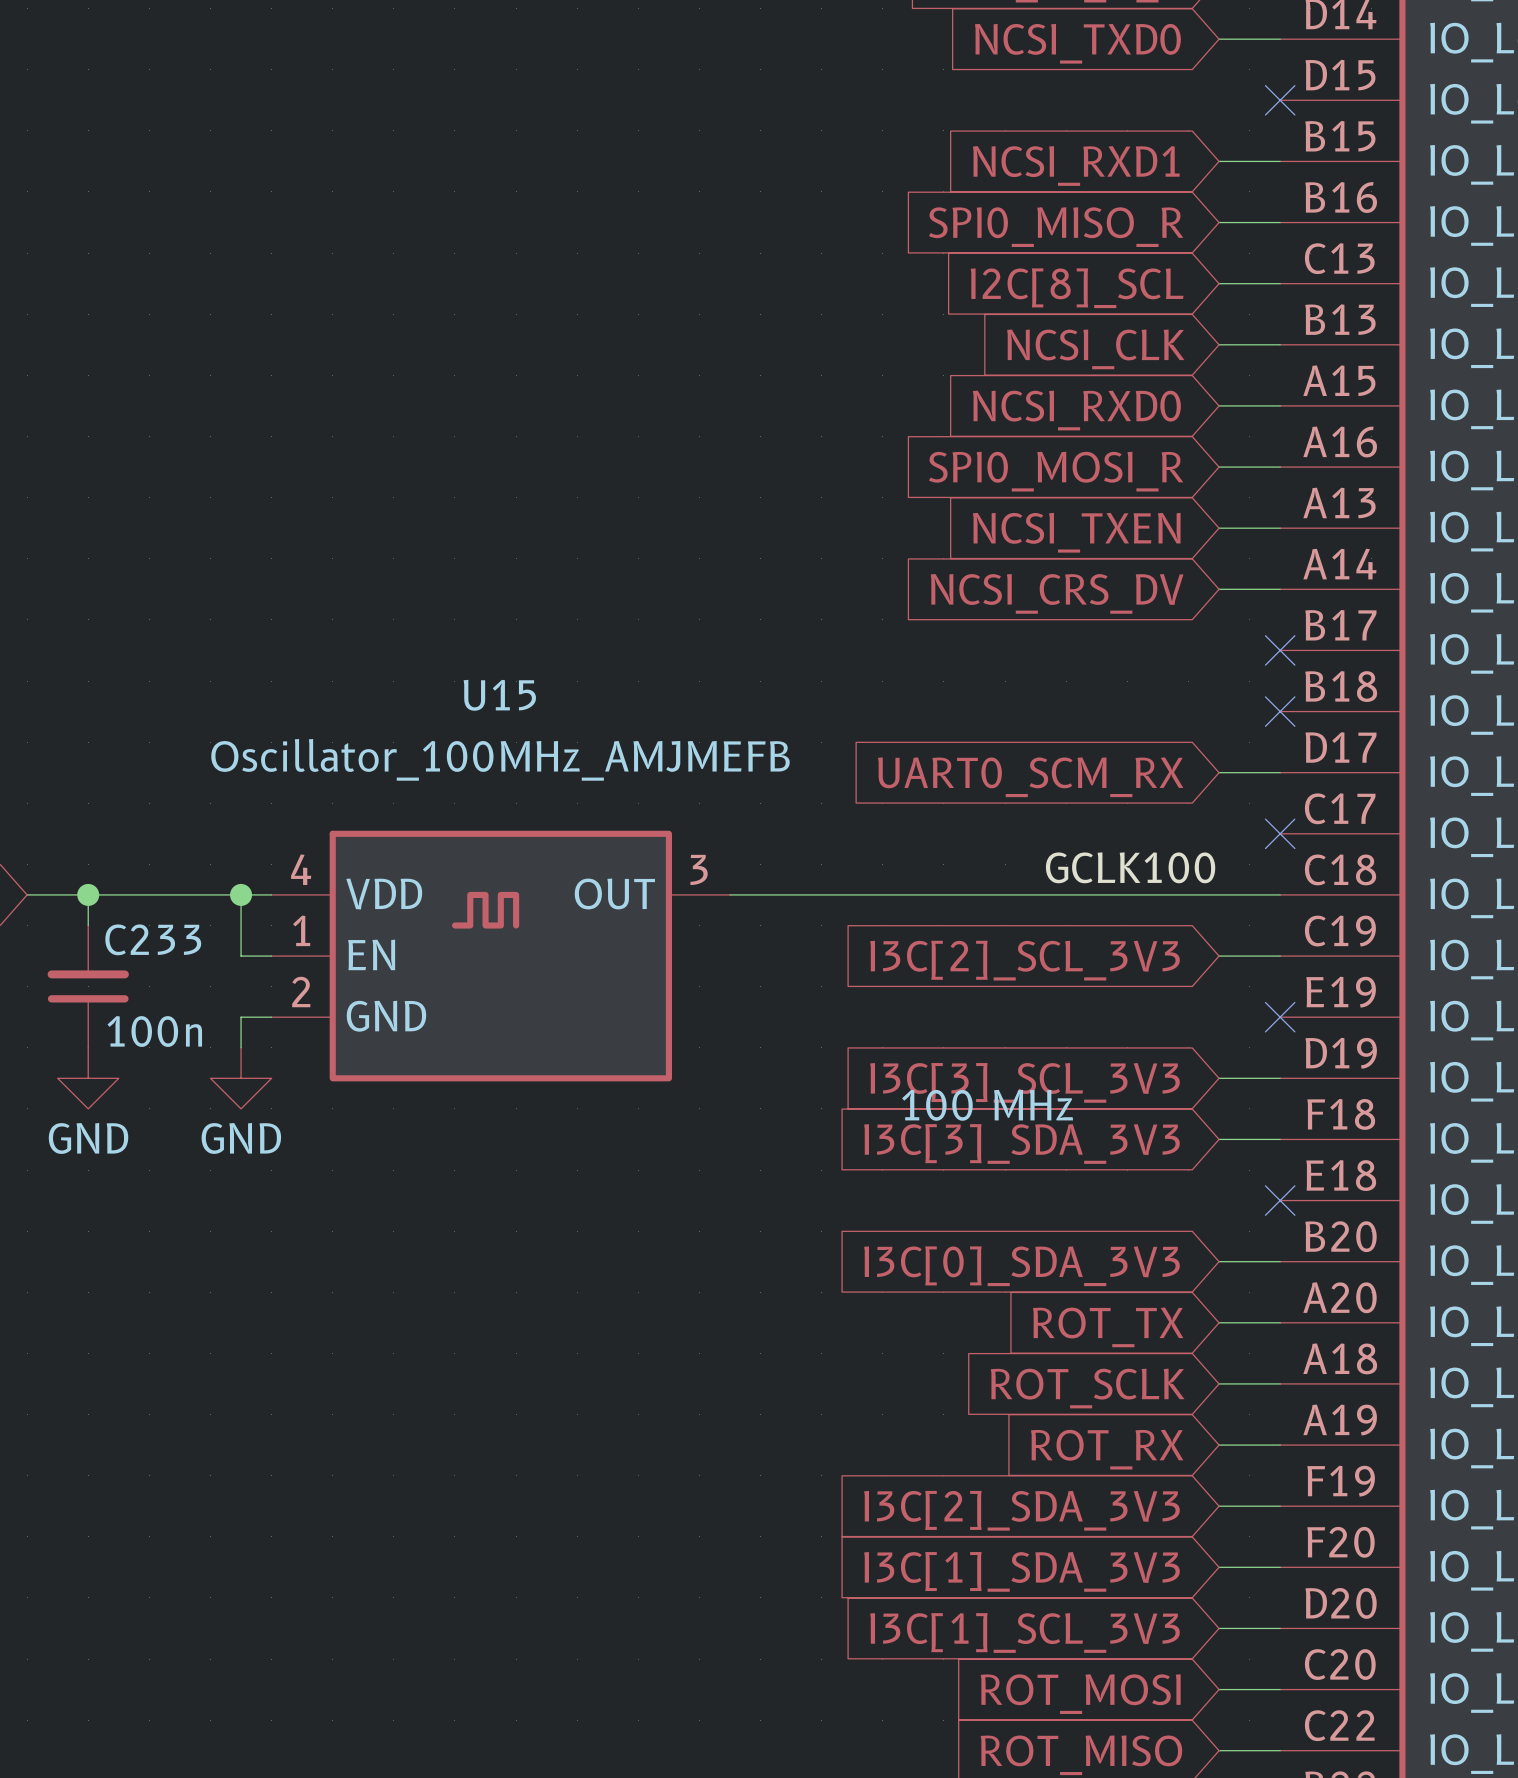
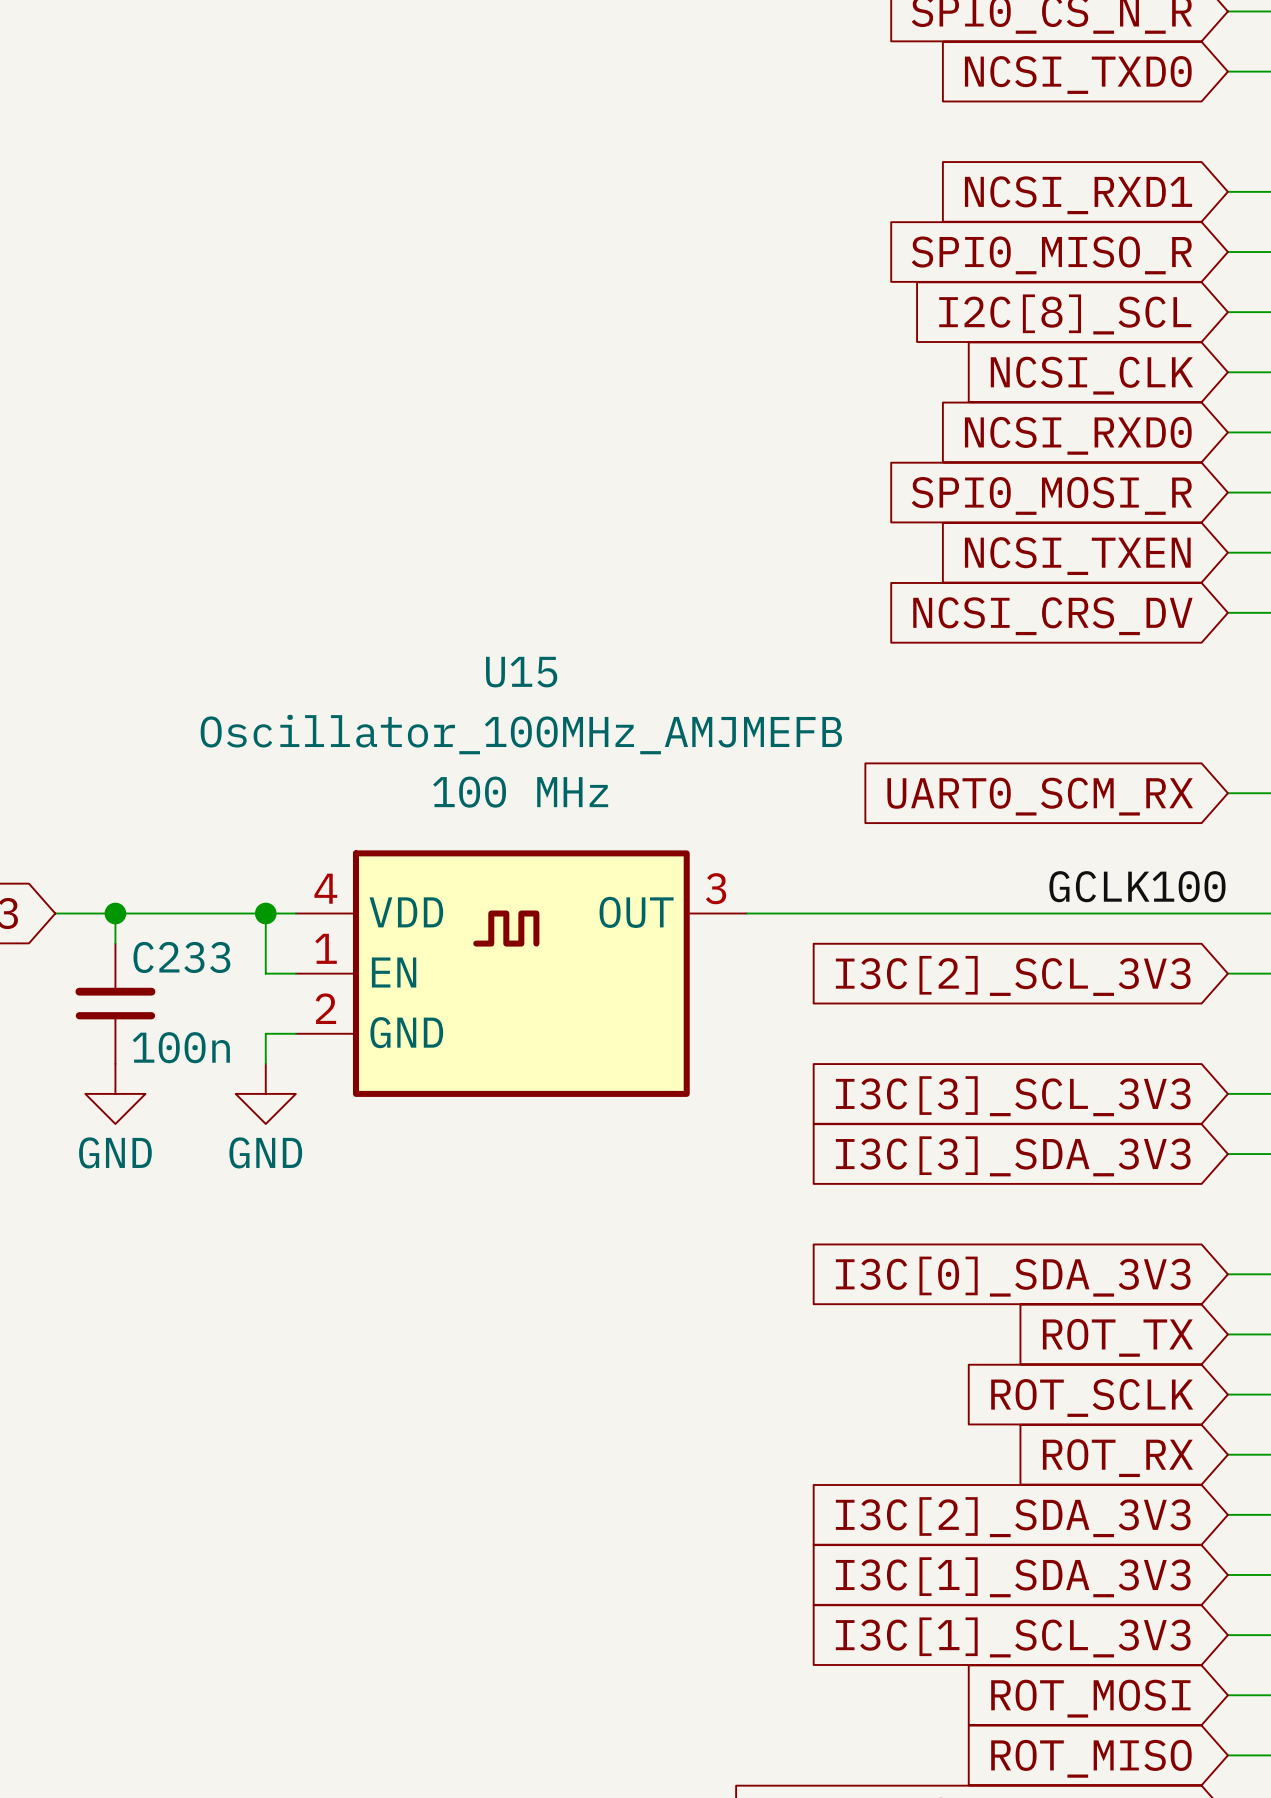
U15 name position: U15 (499, 695) -> U15 (521, 672)
U15 value position: Oscillator_100MHz_AMJMEFB (500, 759) -> Oscillator_100MHz_AMJMEFB (521, 734)
U15 text position: 100 MHz (987, 1105) -> 100 MHz (520, 792)

